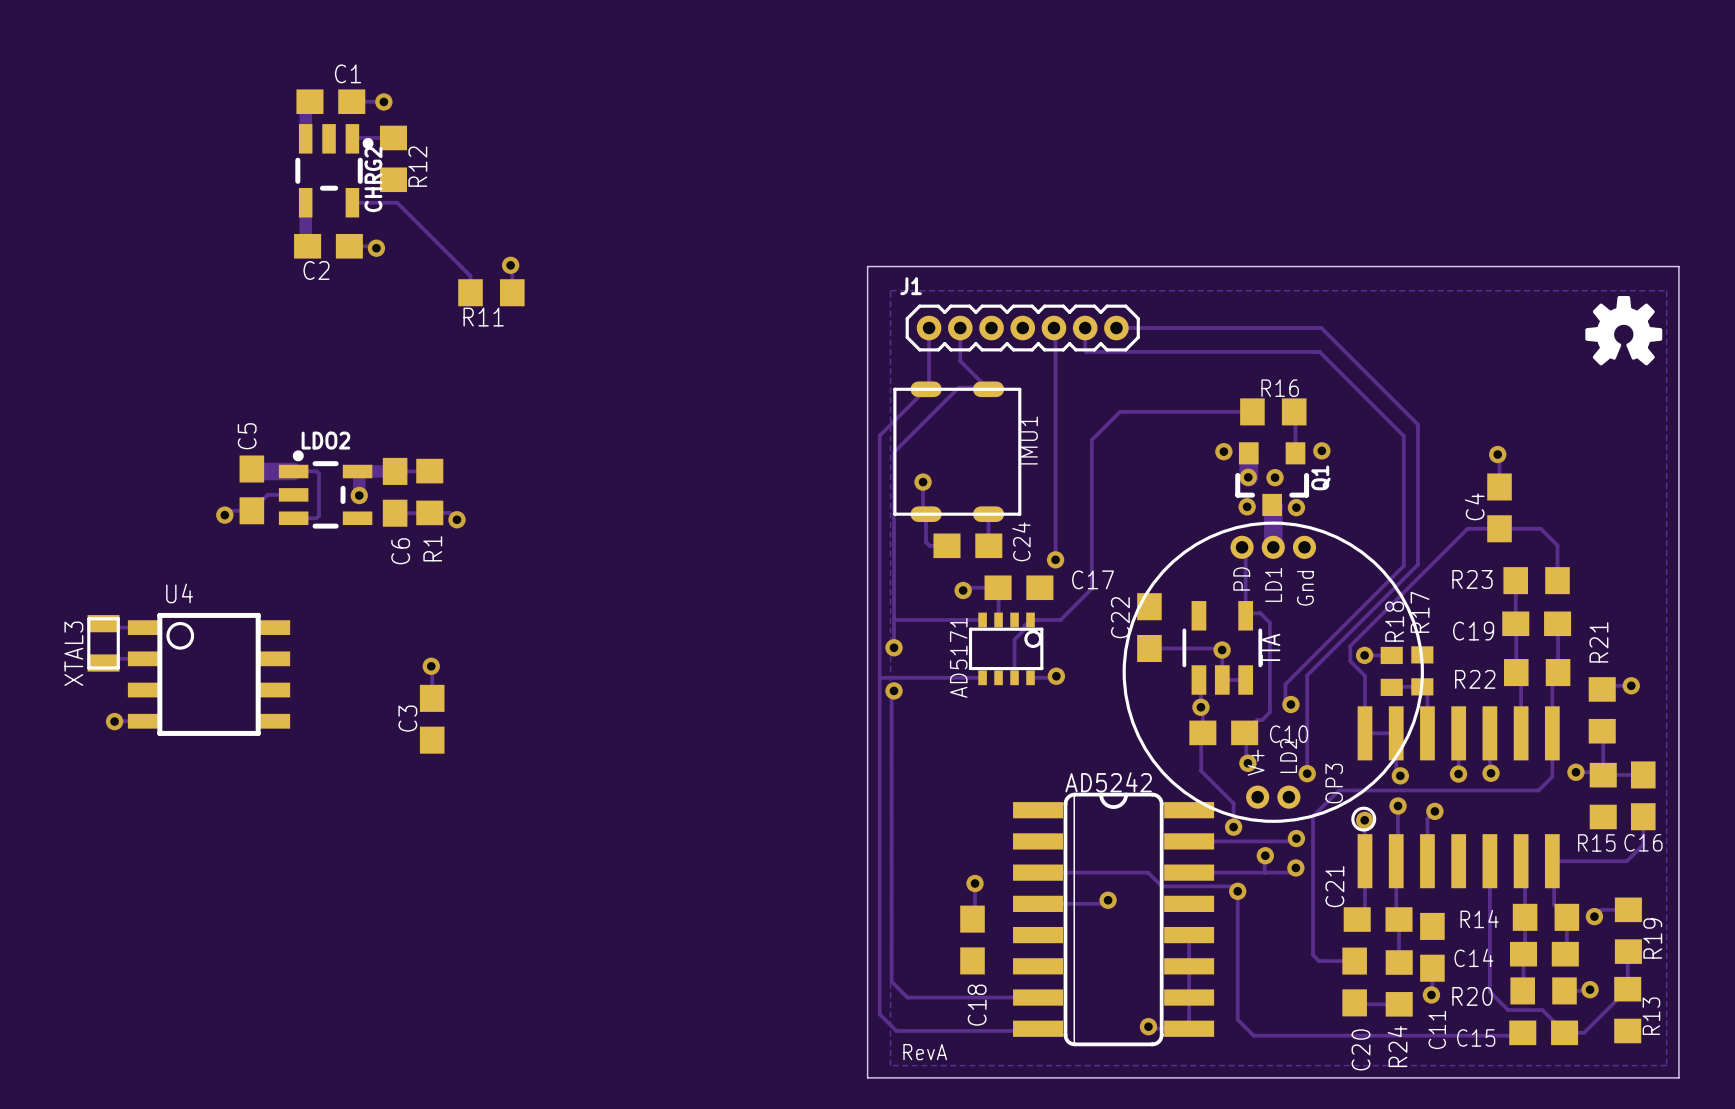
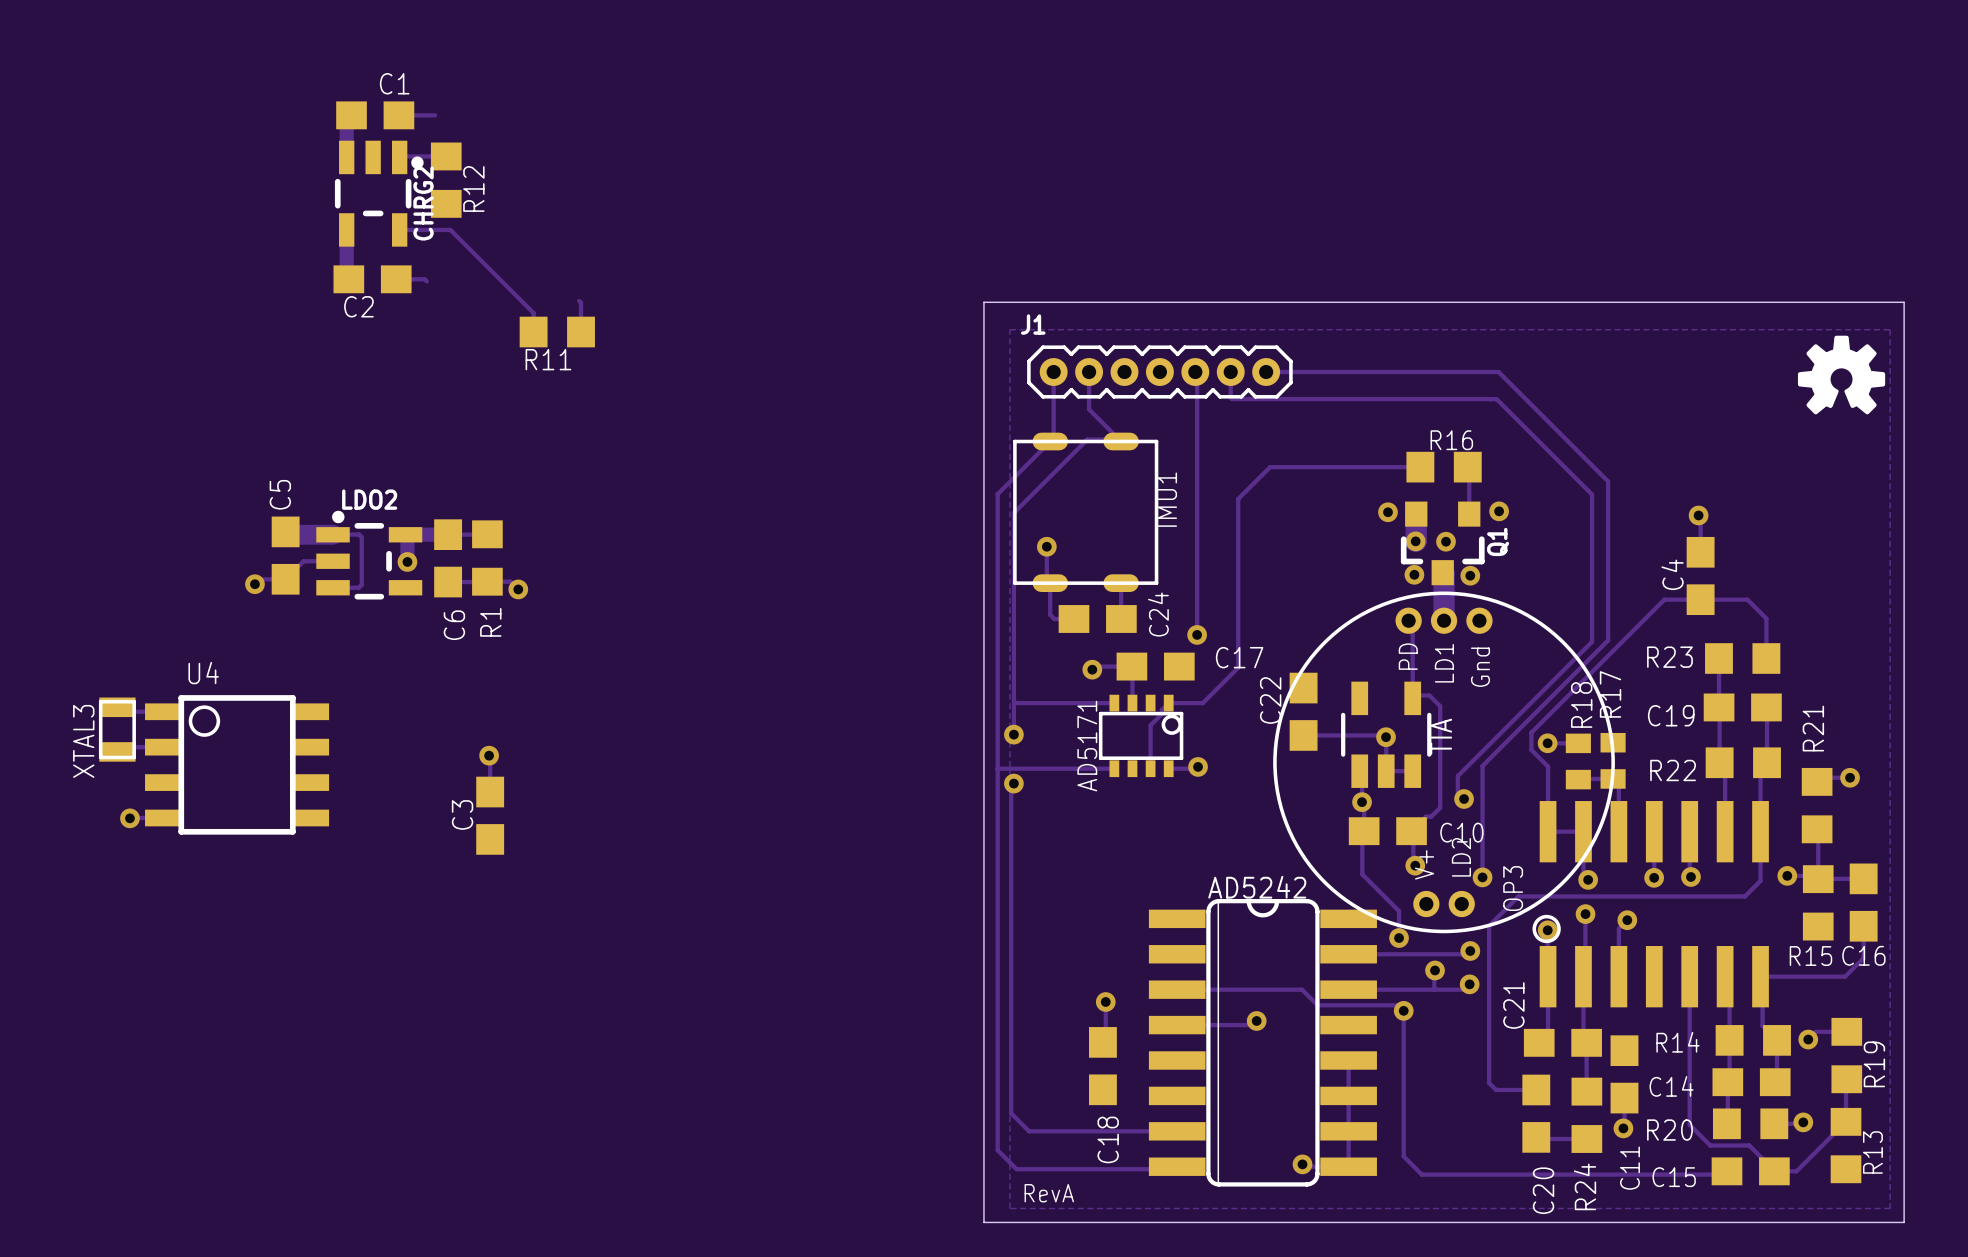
via: (383, 101) -> none
via: (376, 248) -> none
via: (510, 265) -> none

